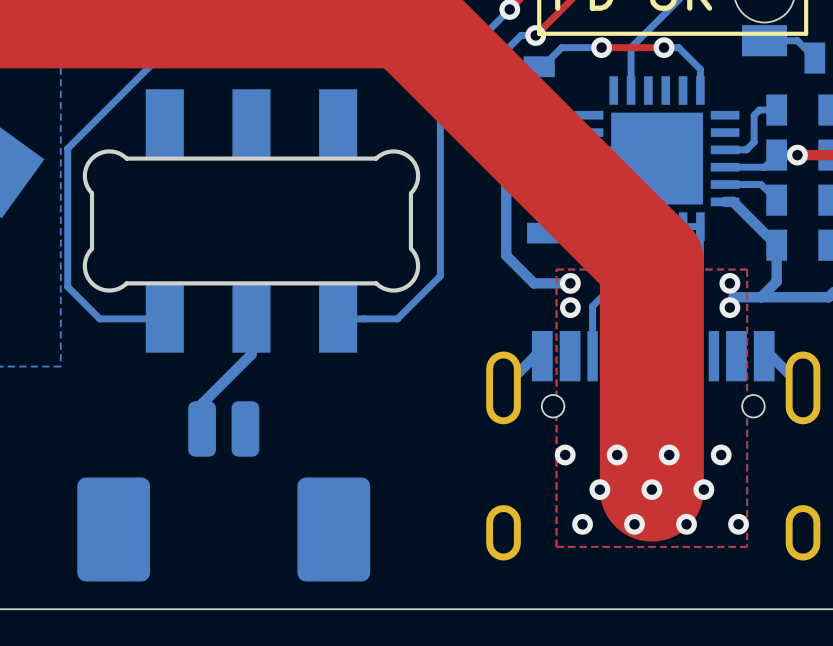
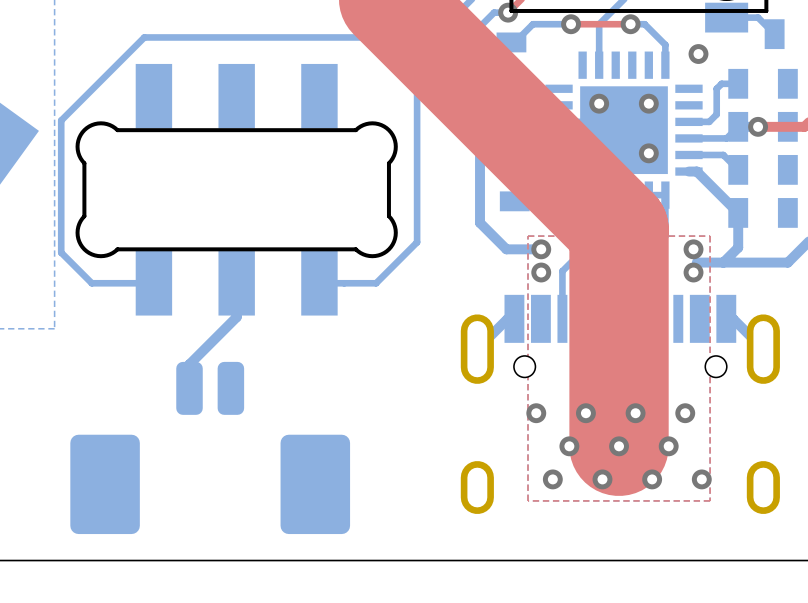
via: none -> (698, 54)
via: none -> (599, 103)
via: none -> (648, 103)
via: none -> (648, 153)

